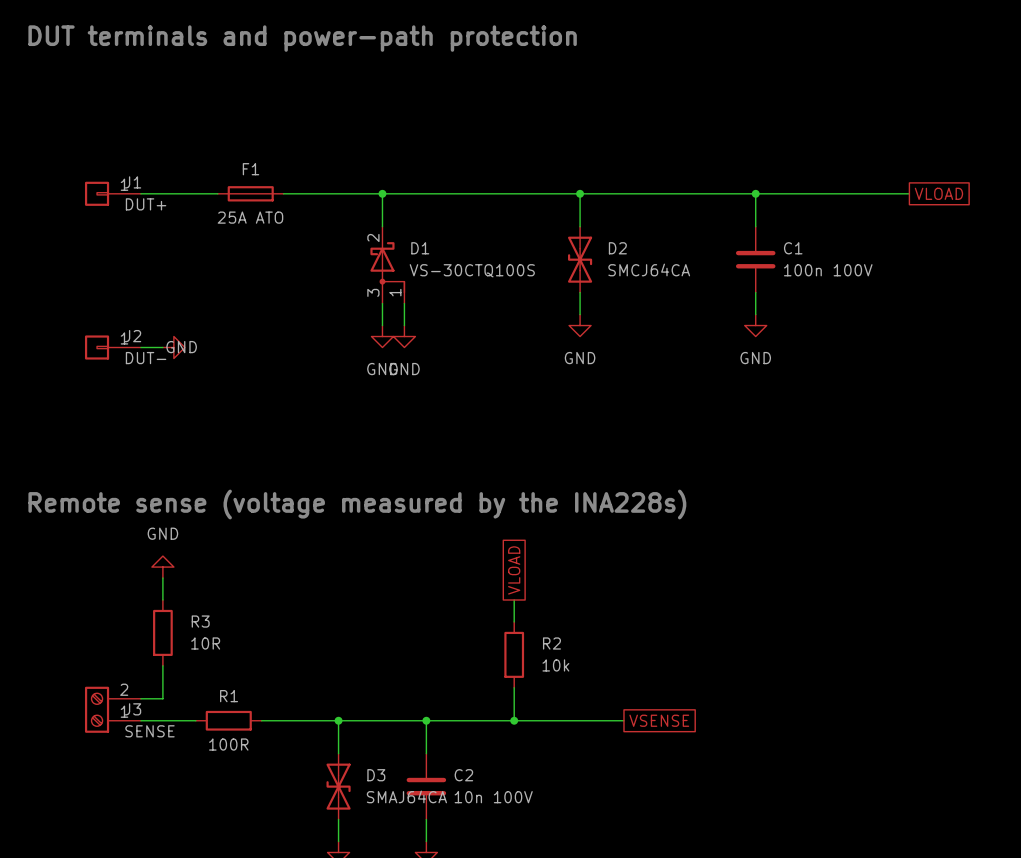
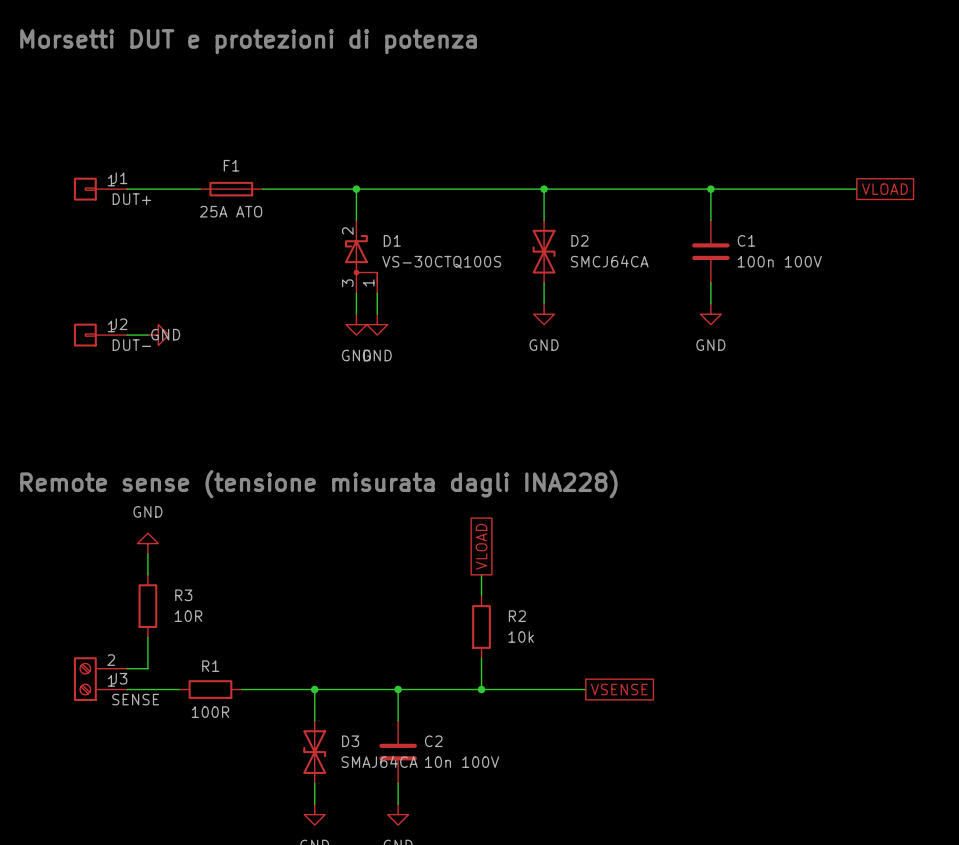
text: DUT terminals and power-path protection (302, 38) -> Morsetti DUT e protezioni di potenza (248, 41)
text: Remote sense (voltage measured by the INA228s) (357, 504) -> Remote sense (tensione misurata dagli INA228) (318, 484)

